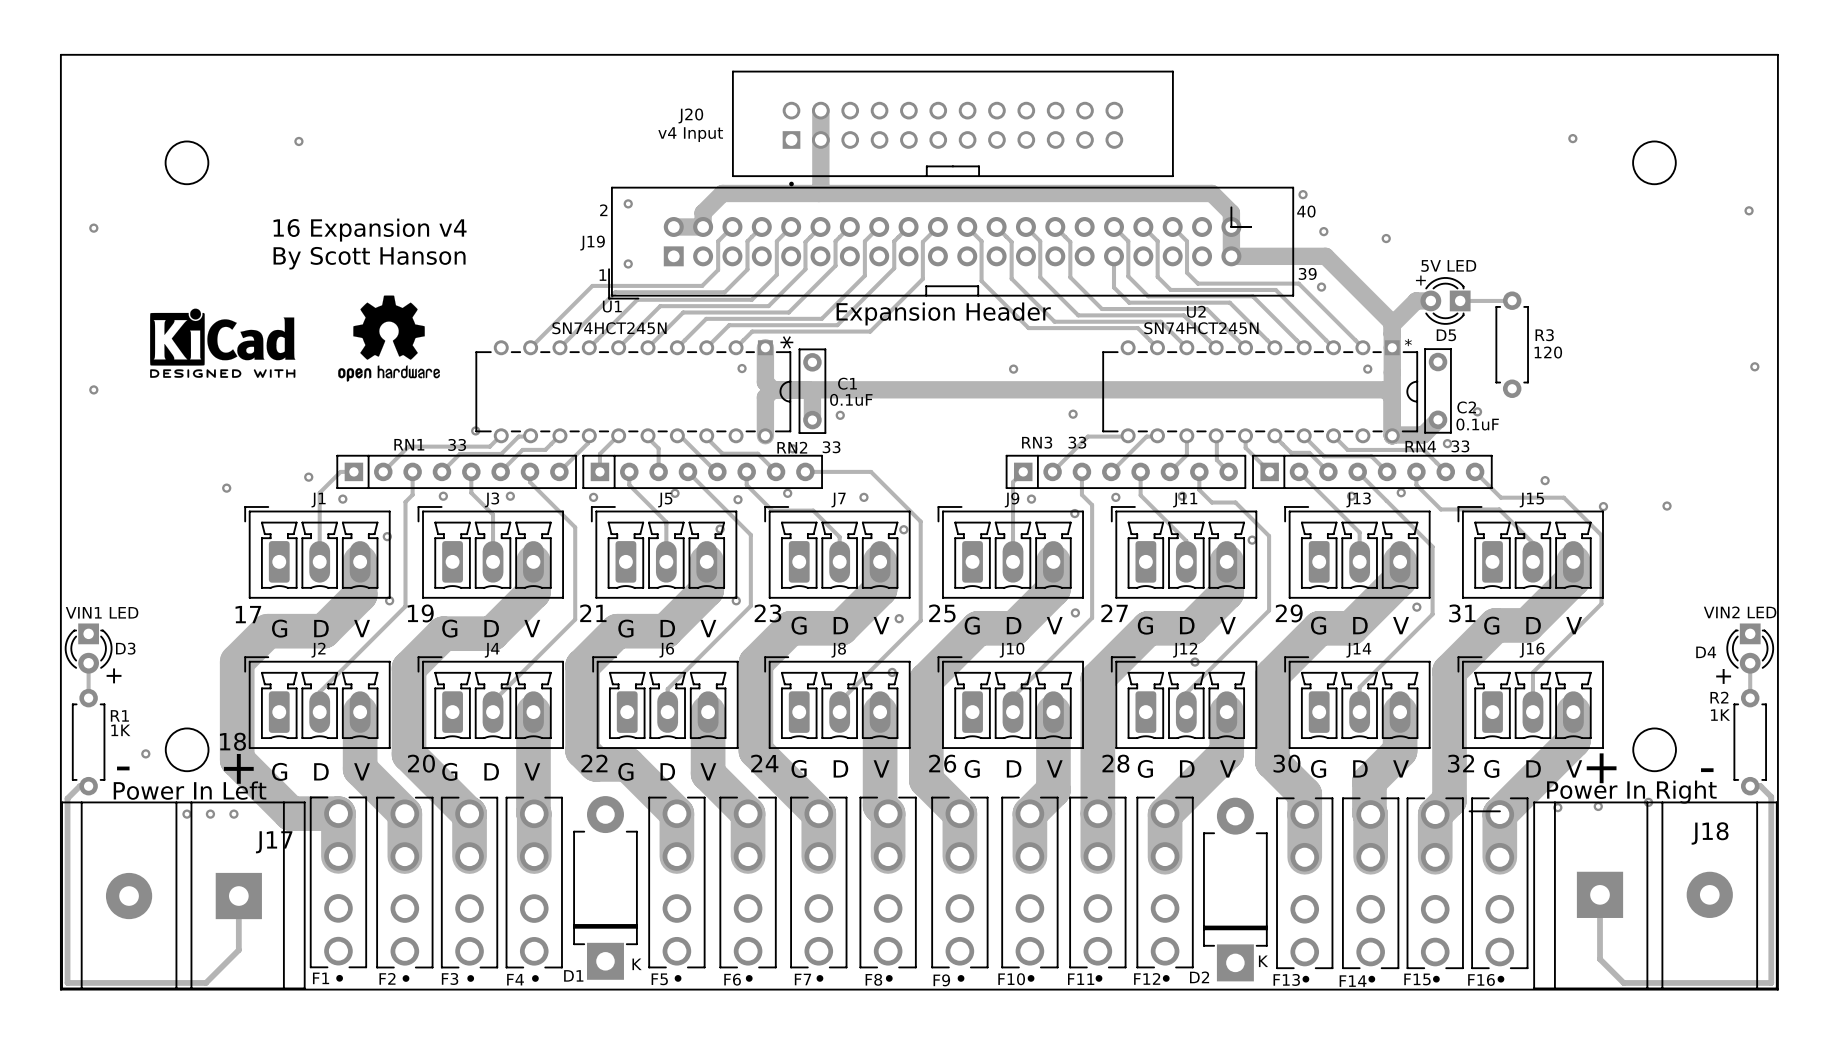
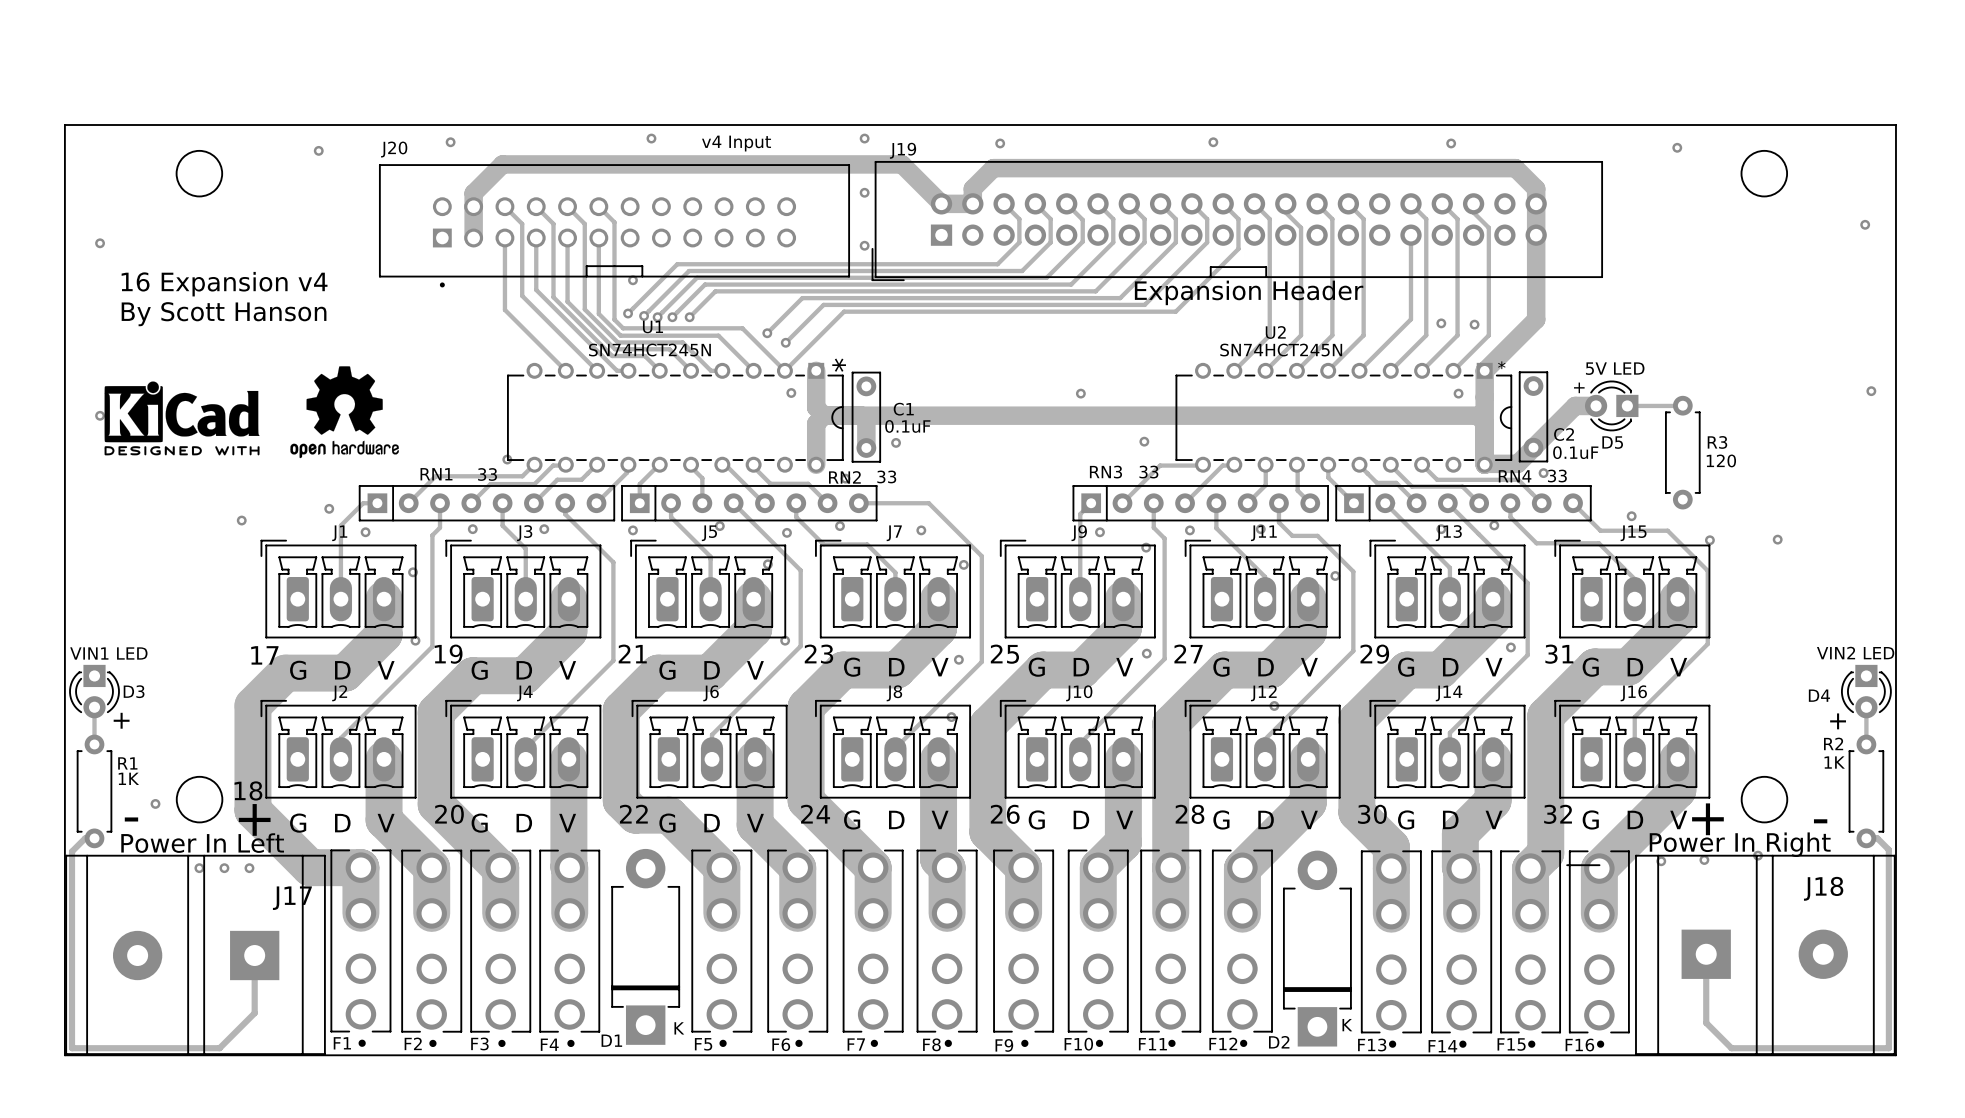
track: (820, 110) (820, 191) (818, 193) -> none
J20 name position: J20 (690, 115) -> J20 (394, 149)
board edge: (60, 117) (60, 54) (1777, 54) (1777, 117) -> (64, 125) (1895, 125)
J20 position: (952, 128) -> (614, 225)
via: none -> (651, 138)
via: none -> (864, 138)
via: none -> (450, 142)
via: none -> (1213, 142)
via: none -> (1000, 143)
via: none -> (1451, 143)
via: none -> (864, 192)
track: none -> (1004, 203) (1019, 219) (1019, 242) (997, 264) (677, 264) (628, 313)
track: none -> (1035, 203) (1050, 219) (1050, 242) (1022, 271) (689, 271) (644, 315)
track: none -> (1066, 203) (1082, 219) (1082, 241) (1046, 277) (697, 277) (657, 317)
track: none -> (1098, 203) (1113, 219) (1113, 242) (1071, 284) (705, 284) (672, 317)
track: none -> (1129, 203) (1144, 219) (1144, 242) (1095, 291) (715, 291) (689, 317)
track: none -> (1160, 203) (1175, 219) (1175, 242) (1120, 298) (802, 298) (767, 333)
track: none -> (1191, 203) (1207, 219) (1207, 242) (1144, 304) (823, 304) (785, 342)
track: none -> (1442, 203) (1457, 219) (1457, 335) (1422, 370)
track: none -> (598, 206) (614, 222) (614, 319) (623, 328) (742, 328) (784, 370)
via: (1303, 194) -> none
via: (628, 203) -> none
line: (1231, 207) (1231, 226) (1251, 226) -> none
text: 2 (603, 210) -> none
text: 40 (1306, 211) -> none
track: (673, 226) (703, 226) (703, 212) (722, 193) (1212, 193) (1231, 212) (1231, 256) (1325, 256) (1392, 322) (1392, 347) -> (473, 237) (473, 193) (502, 164) (902, 164) (941, 203) (972, 203) (972, 188) (993, 168) (1515, 168) (1536, 188) (1536, 319) (1484, 370)
track: (732, 226) (718, 241) (718, 269) (702, 285) (592, 285) (530, 347) -> (504, 237) (504, 309) (565, 370)
track: (761, 226) (747, 241) (747, 269) (724, 292) (615, 292) (559, 347) -> (504, 206) (522, 223) (522, 295) (597, 370)
track: (791, 226) (776, 241) (776, 274) (751, 299) (637, 299) (589, 347) -> (536, 237) (536, 289) (617, 370) (628, 370)
track: (820, 226) (805, 242) (805, 269) (768, 306) (660, 306) (618, 347) -> (536, 206) (553, 223) (553, 297) (612, 356) (644, 356) (659, 370)
track: (849, 226) (835, 241) (835, 265) (788, 312) (683, 312) (648, 347) -> (567, 237) (567, 301) (615, 349) (669, 349) (691, 370)
track: (879, 226) (864, 241) (864, 275) (821, 318) (706, 318) (677, 347) -> (567, 206) (584, 223) (584, 309) (617, 342) (682, 342) (711, 370) (722, 370)
track: (908, 226) (894, 241) (894, 268) (837, 325) (729, 325) (706, 347) -> (598, 237) (598, 313) (620, 335) (718, 335) (753, 370)
track: (937, 226) (922, 242) (922, 279) (870, 331) (752, 331) -> (1223, 203) (1238, 219) (1238, 248) (1175, 311) (844, 311) (802, 353)
track: (967, 226) (981, 241) (981, 281) (1028, 328) (1137, 328) (1157, 347) -> (1254, 203) (1269, 219) (1269, 335) (1234, 370)
track: (996, 226) (1011, 242) (1011, 278) (1054, 321) (1160, 321) (1186, 347) -> (1285, 203) (1285, 212) (1301, 227) (1301, 335) (1265, 370)
track: (1025, 226) (1040, 241) (1040, 277) (1078, 315) (1183, 315) (1216, 347) -> (1317, 203) (1332, 219) (1332, 335) (1296, 370)
track: (1055, 226) (1070, 242) (1070, 277) (1101, 309) (1206, 309) (1245, 347) -> (1348, 203) (1363, 219) (1363, 335) (1328, 370)
track: (1114, 226) (1128, 241) (1128, 276) (1148, 296) (1252, 296) (1304, 347) -> (1410, 203) (1426, 219) (1426, 335) (1390, 370)
track: (1143, 226) (1157, 241) (1157, 276) (1170, 289) (1275, 289) (1333, 347) (1327, 347) -> none
track: (1172, 226) (1187, 241) (1187, 272) (1197, 283) (1298, 283) (1362, 347) -> (1473, 203) (1473, 212) (1488, 227) (1488, 335) (1453, 370)
text position: 16 Expansion v4 (370, 230) -> 16 Expansion v4 (224, 284)
via: none -> (864, 245)
via: (1323, 231) -> none
via: (1386, 238) -> none
J19 name position: J19 (592, 243) -> J19 (903, 150)
J19 position: (951, 243) -> (1237, 221)
track: (1114, 256) (1114, 287) (1129, 302) (1229, 302) (1274, 347) -> (1410, 235) (1410, 319) (1359, 370)
text position: By Scott Hanson (369, 258) -> By Scott Hanson (224, 314)
via: none -> (632, 280)
via: (628, 263) -> none
text: 39 (1307, 273) -> none
text: 1 (602, 275) -> none
text position: + (1420, 280) -> + (1579, 387)
via: (1321, 287) -> none
via: none -> (628, 313)
line: (926, 295) (926, 286) (978, 286) (978, 295) -> (1210, 276) (1210, 267) (1266, 267) (1266, 276)
via: none -> (644, 315)
via: none -> (657, 317)
via: none -> (672, 317)
via: none -> (689, 317)
track: (1430, 300) (1416, 300) (1392, 324) -> none
D5 position: (1445, 300) -> (1611, 405)
track: (1512, 300) (1460, 300) -> (1682, 405) (1627, 405)
via: none -> (1441, 323)
via: none -> (1474, 324)
via: none -> (767, 333)
J19 value position: Expansion Header (943, 313) -> Expansion Header (1249, 292)
via: none -> (785, 342)
drawing position: (389, 338) -> (344, 412)
drawing position: (222, 343) -> (182, 418)
R3 position: (1512, 344) -> (1682, 452)
track: none -> (1596, 405) (1575, 405) (1533, 447)
via: (1477, 411) -> none
via position: (1545, 480) -> (1631, 516)

